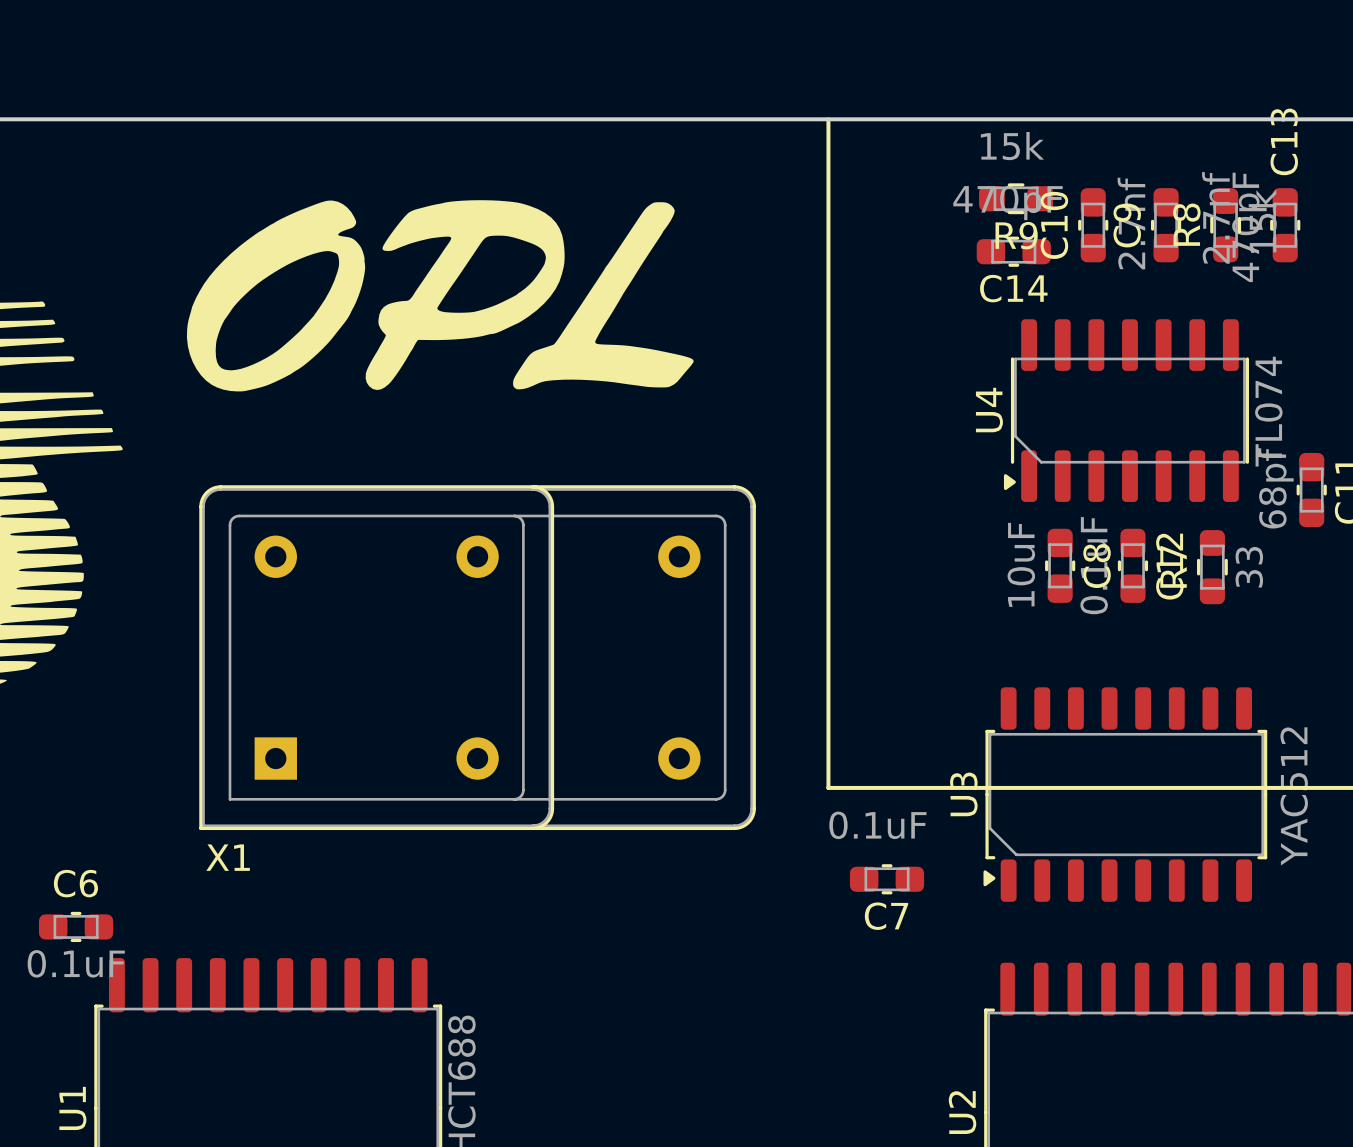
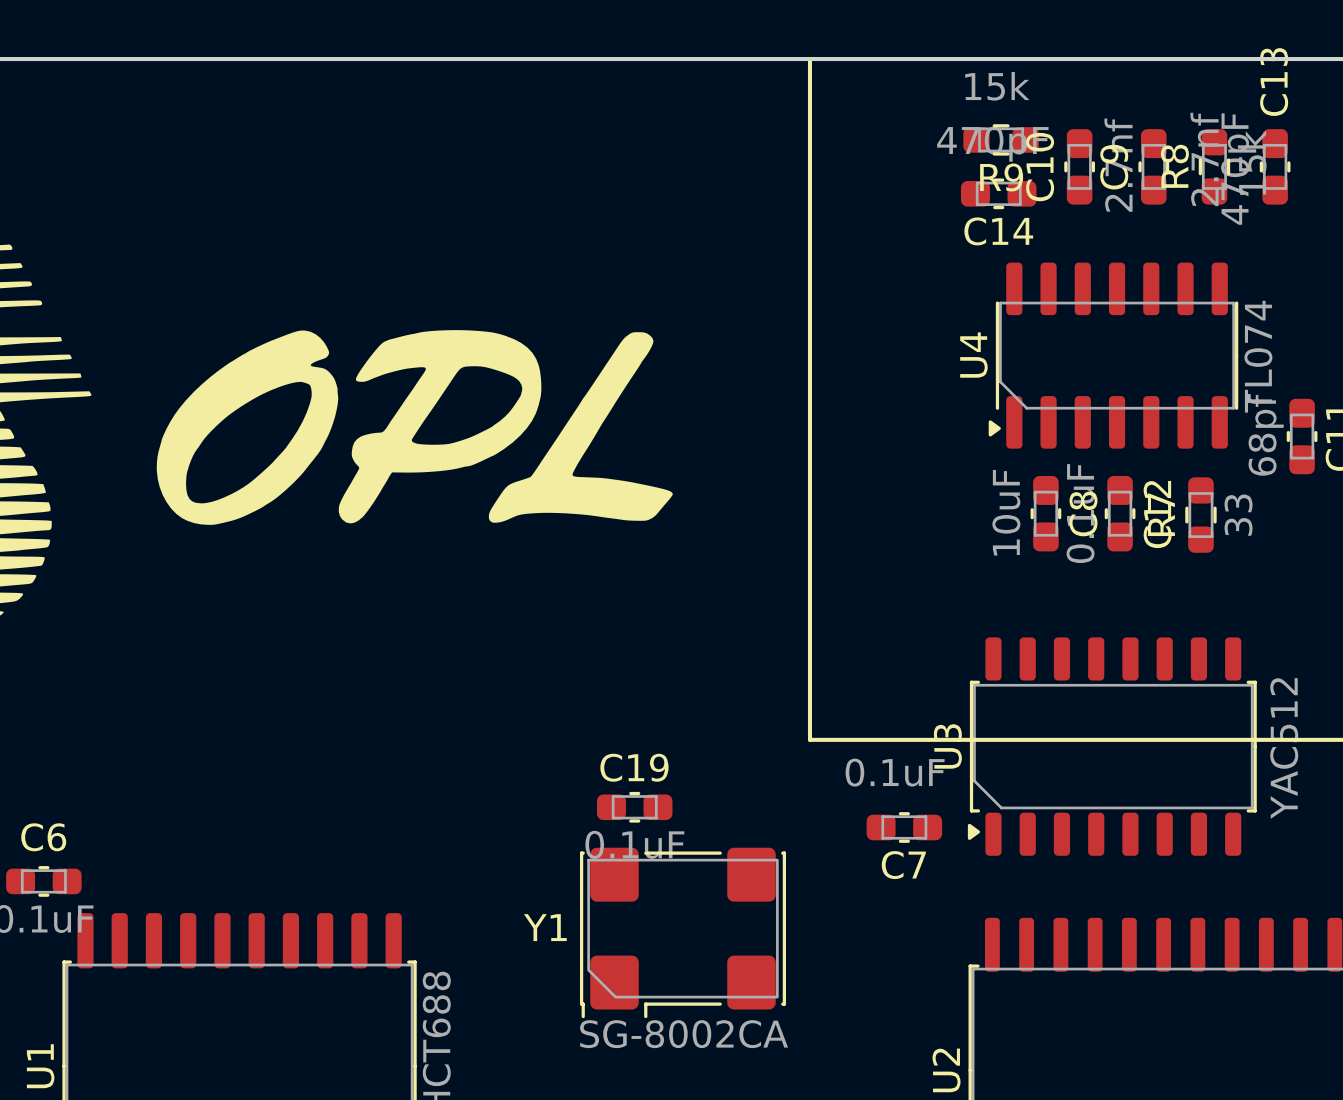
drawing position: (440, 295) -> (414, 427)
X1: (477, 657) -> none
C19: none -> 0.1uF (634, 807)
C7 position: (887, 879) -> (904, 827)
Y1: none -> SG-8002CA (682, 932)

